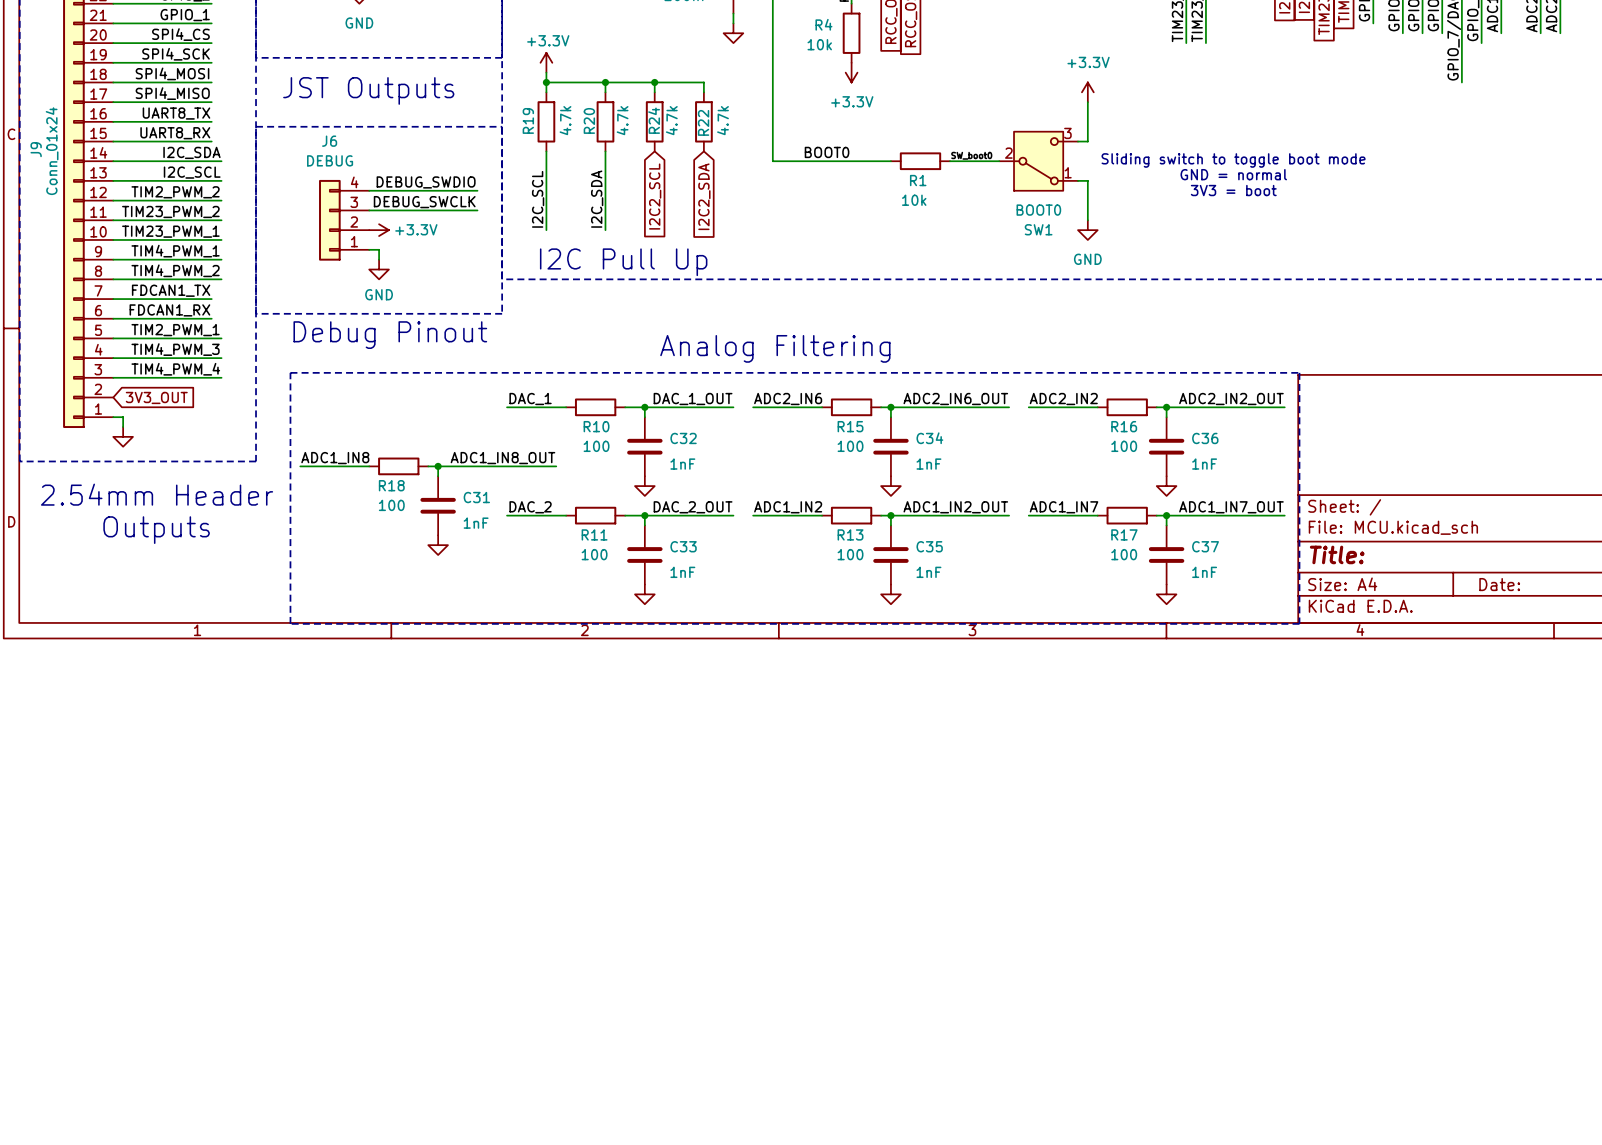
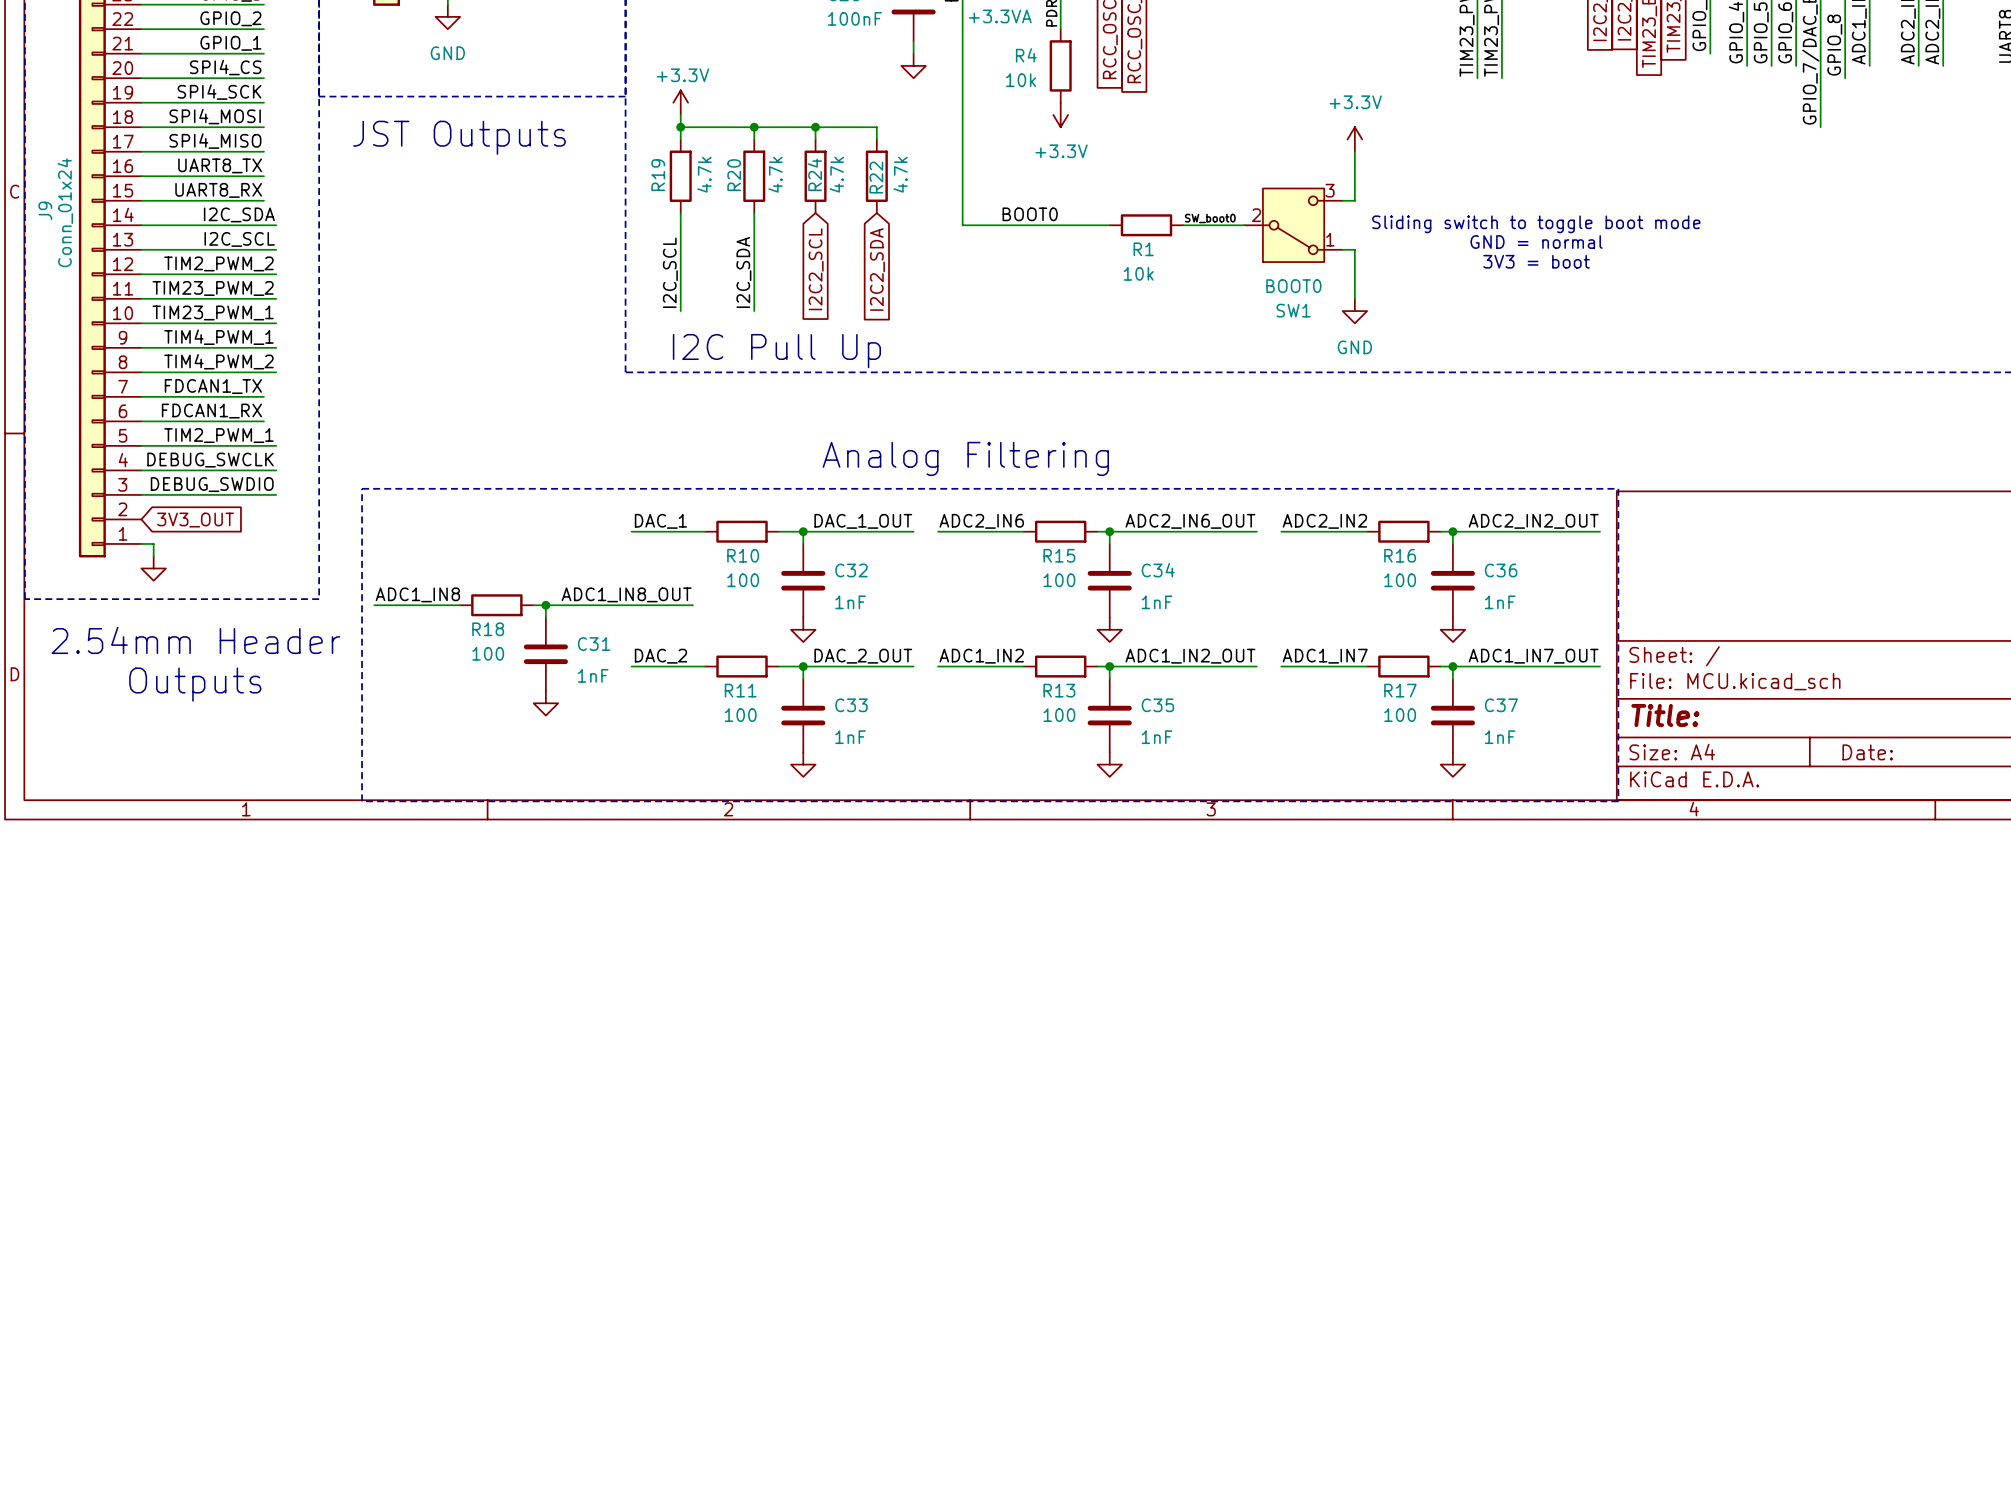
line: (256, 126) (502, 126) (502, 313) (256, 313) (256, 126) -> none
label: DEBUG_SWDIO (426, 182) -> none
wire: (369, 190) (477, 190) -> none
label: DEBUG_SWCLK (424, 202) -> none
wire: (369, 210) (477, 210) -> none
J6: DEBUG (344, 220) -> none
power symbol: +3.3V (379, 230) -> none
wire: (369, 249) (379, 249) (379, 259) -> none
power symbol: GND (379, 269) -> none
text: Debug Pinout (390, 335) -> none
label: TIM4_PWM_3 (175, 349) -> DEBUG_SWCLK (210, 460)
label: TIM4_PWM_4 (175, 369) -> DEBUG_SWDIO (212, 484)

